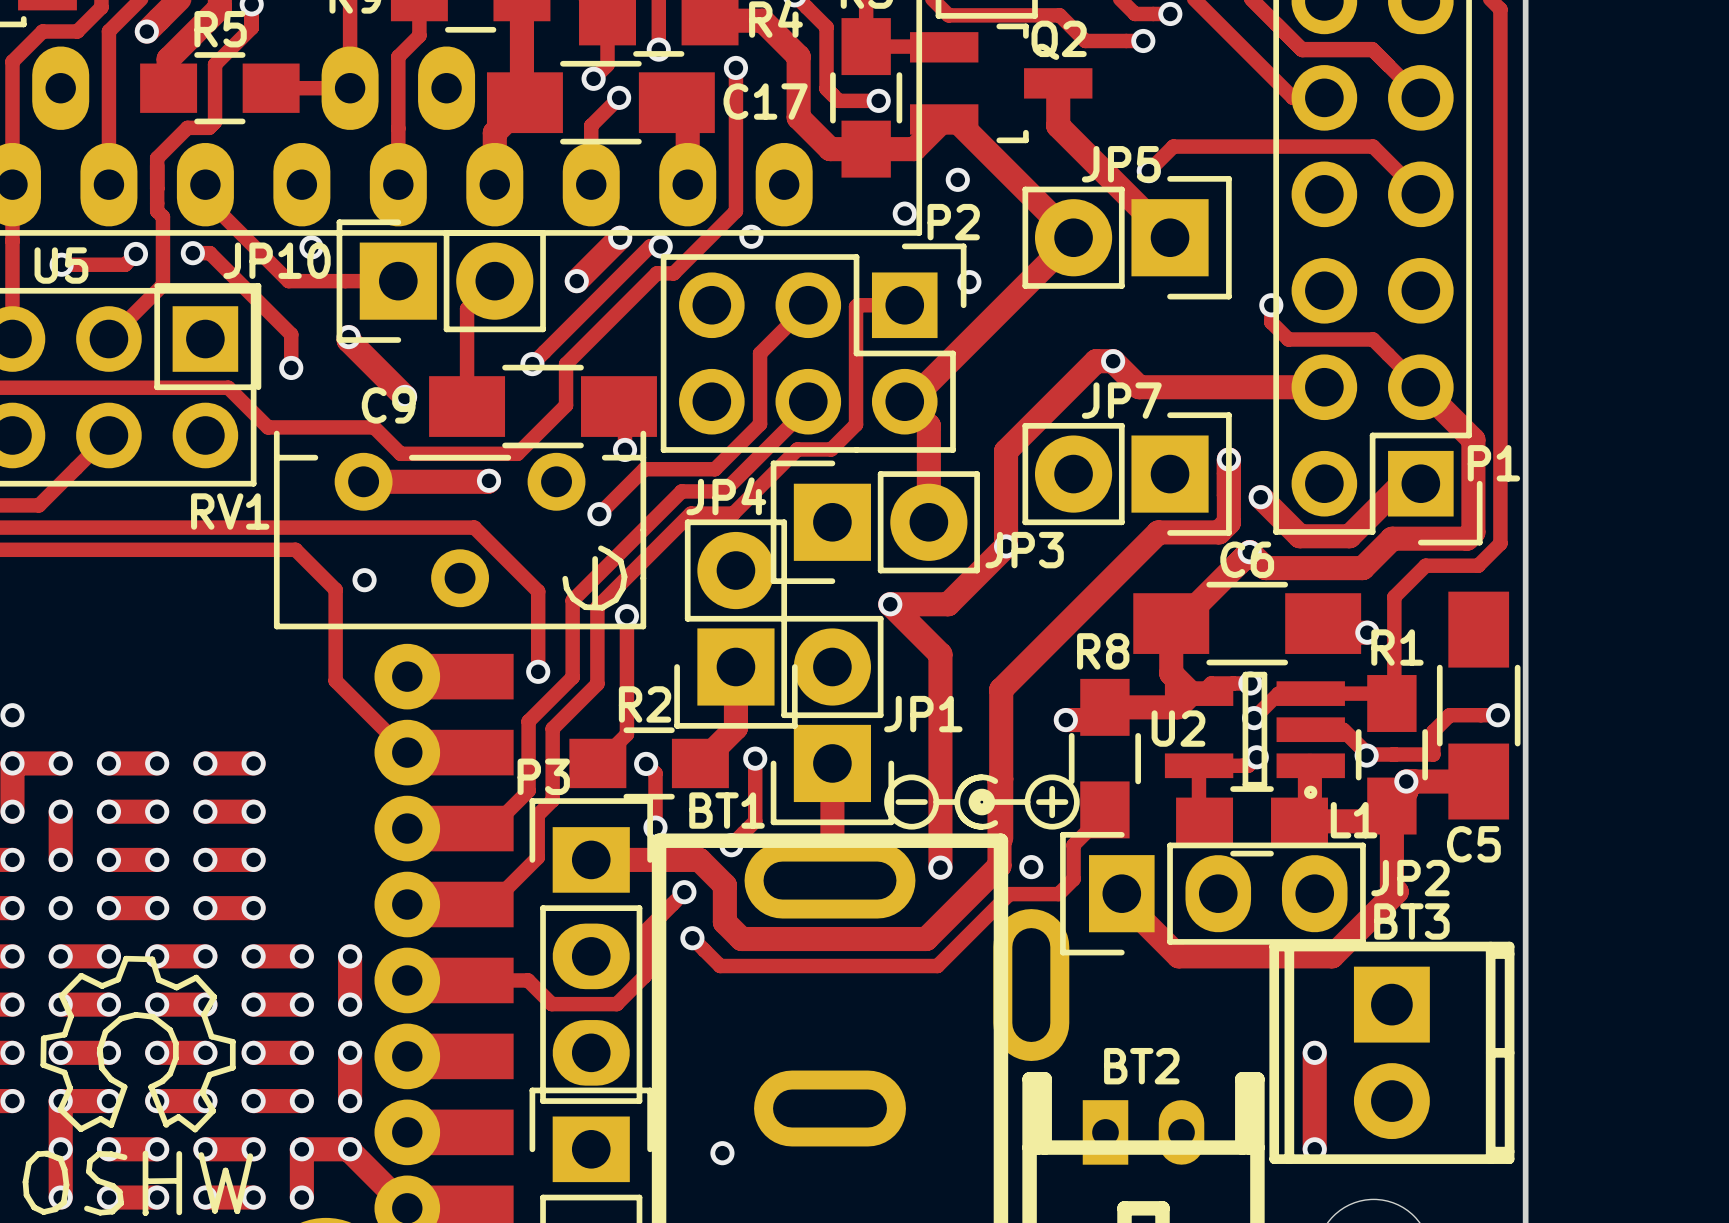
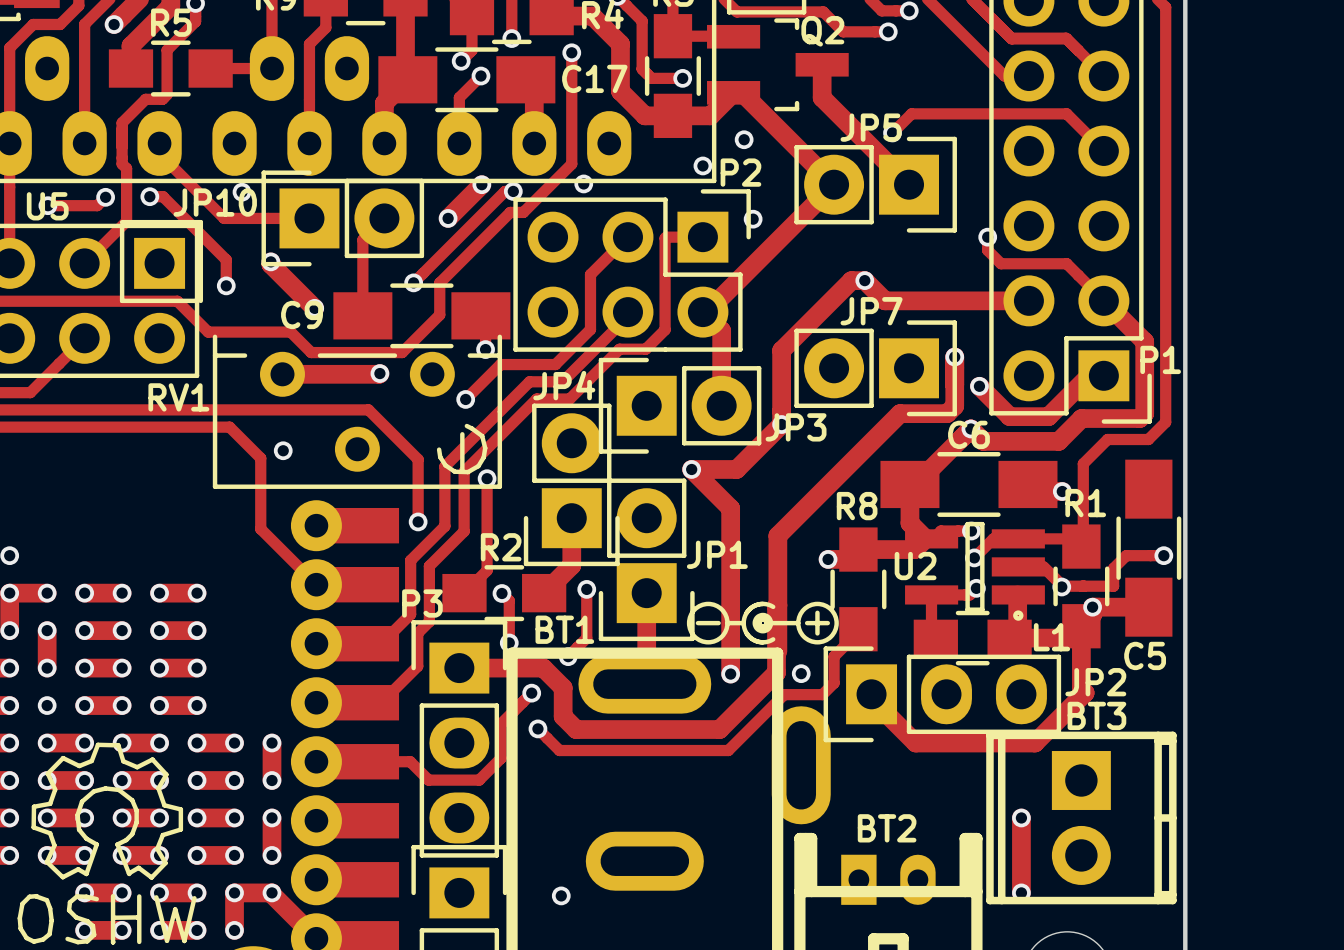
track: (60, 1101) (60, 1197) -> none
via: (60, 1149) -> none
via: (60, 1197) -> none

